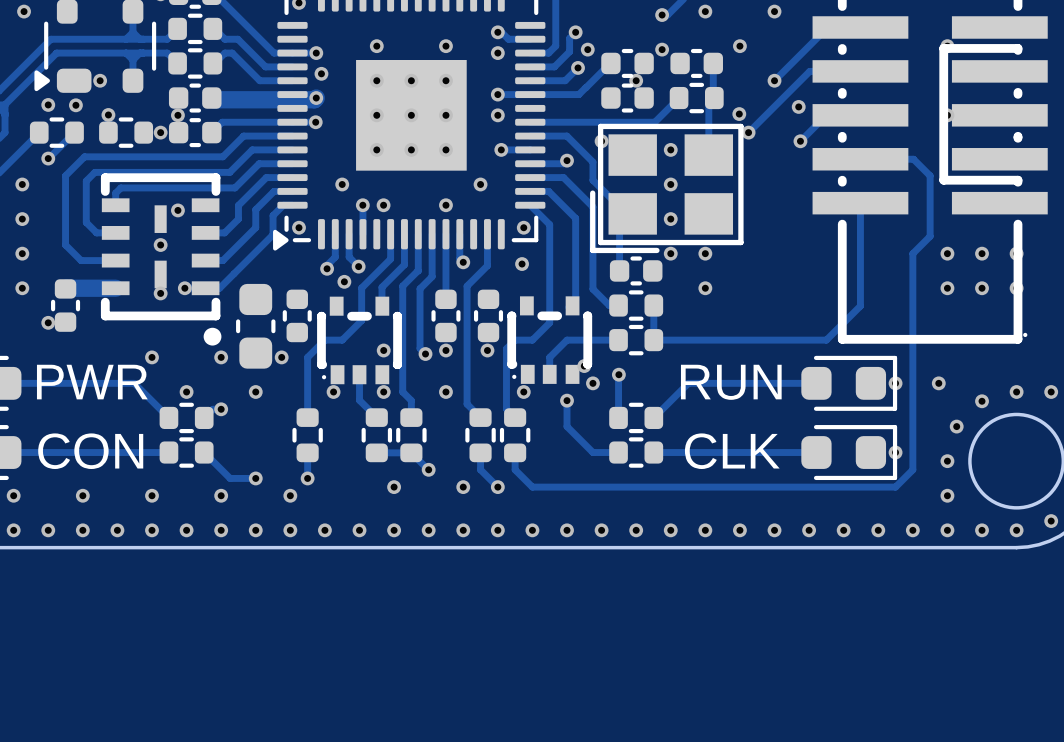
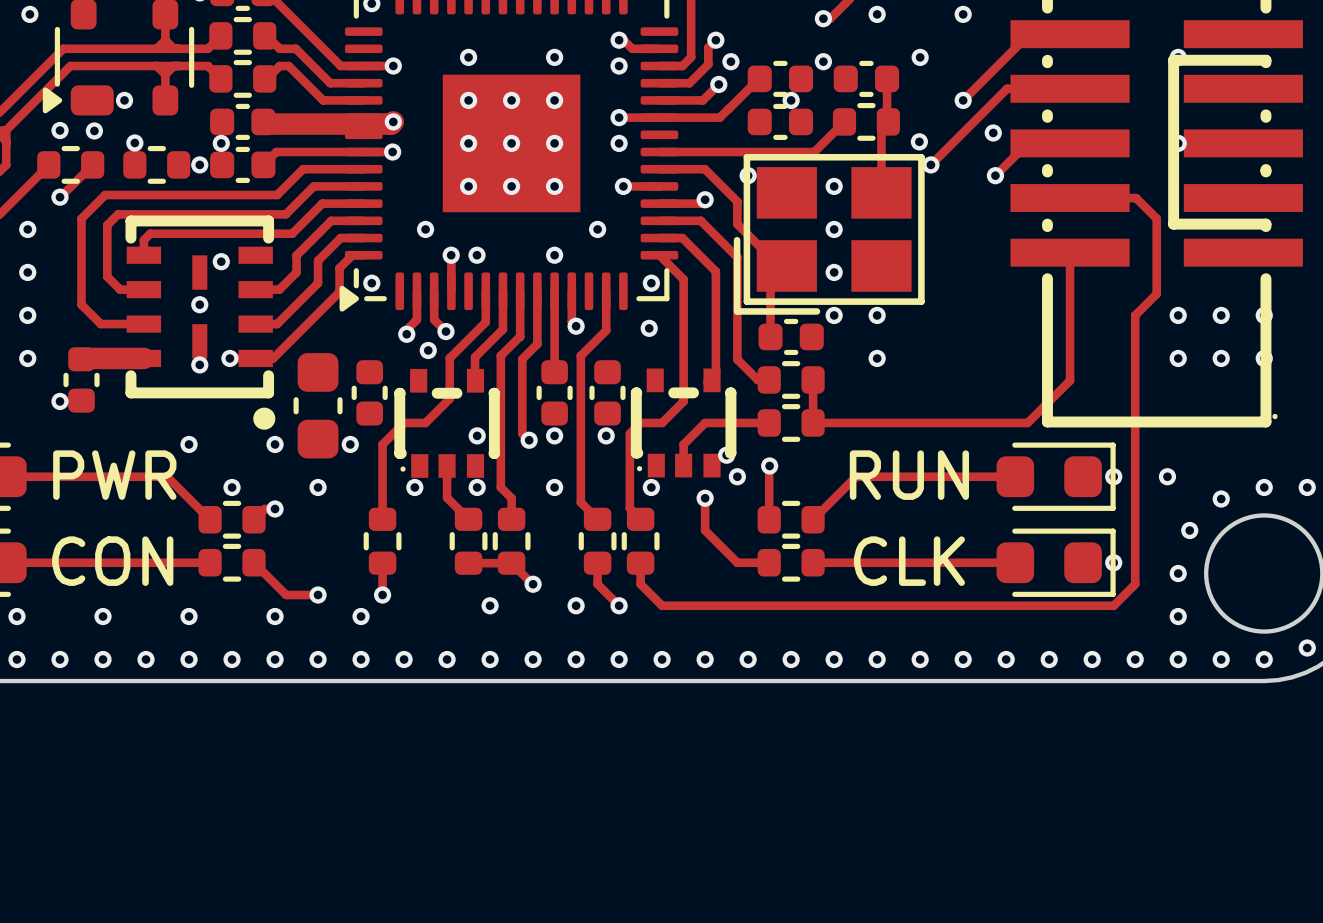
via: (321, 73) -> none

